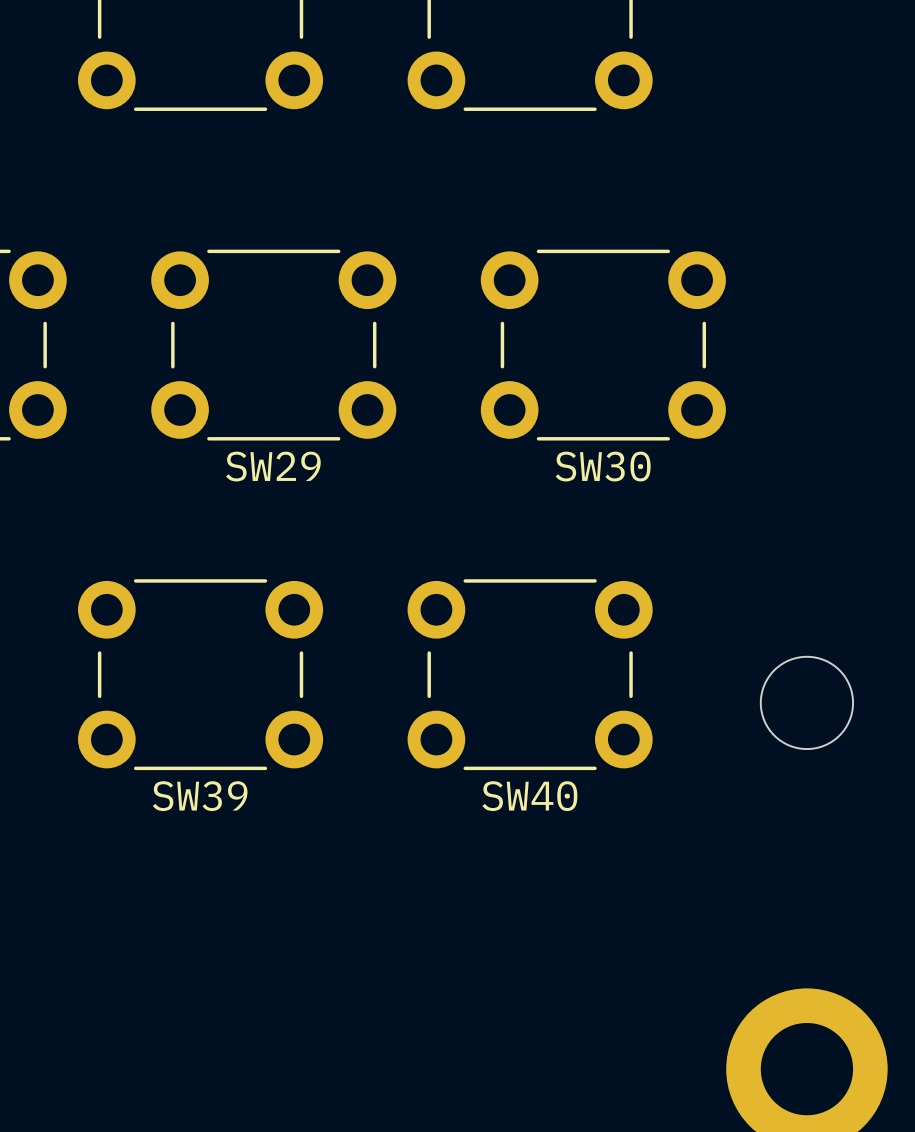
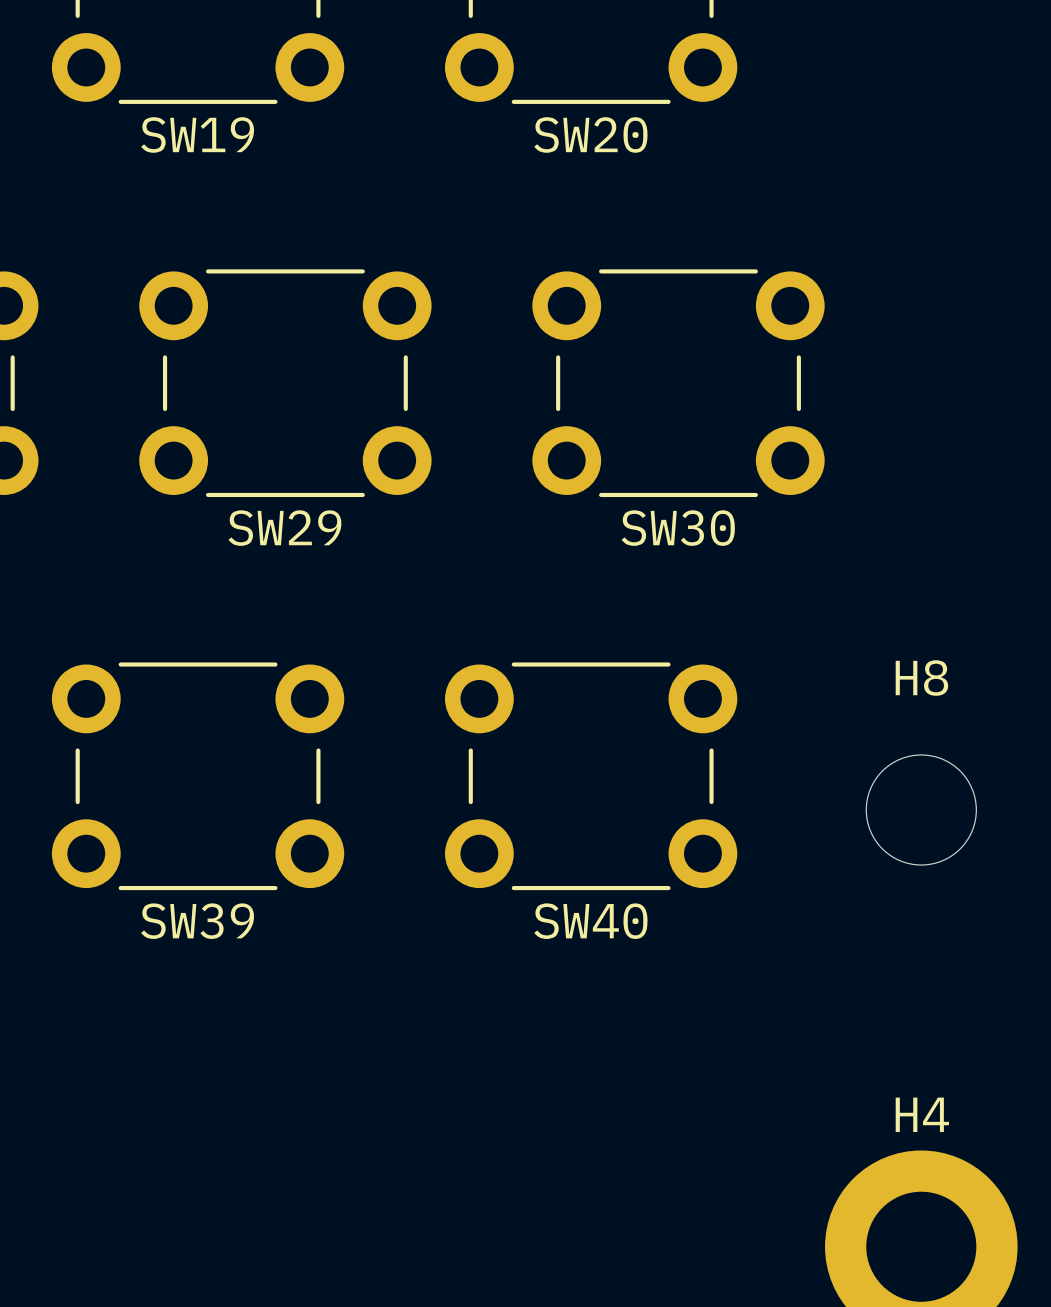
SW19 name: none -> SW19 (197, 134)
SW20 name: none -> SW20 (590, 134)
H8 name: none -> H8 (921, 678)
H4 name: none -> H4 (922, 1114)

